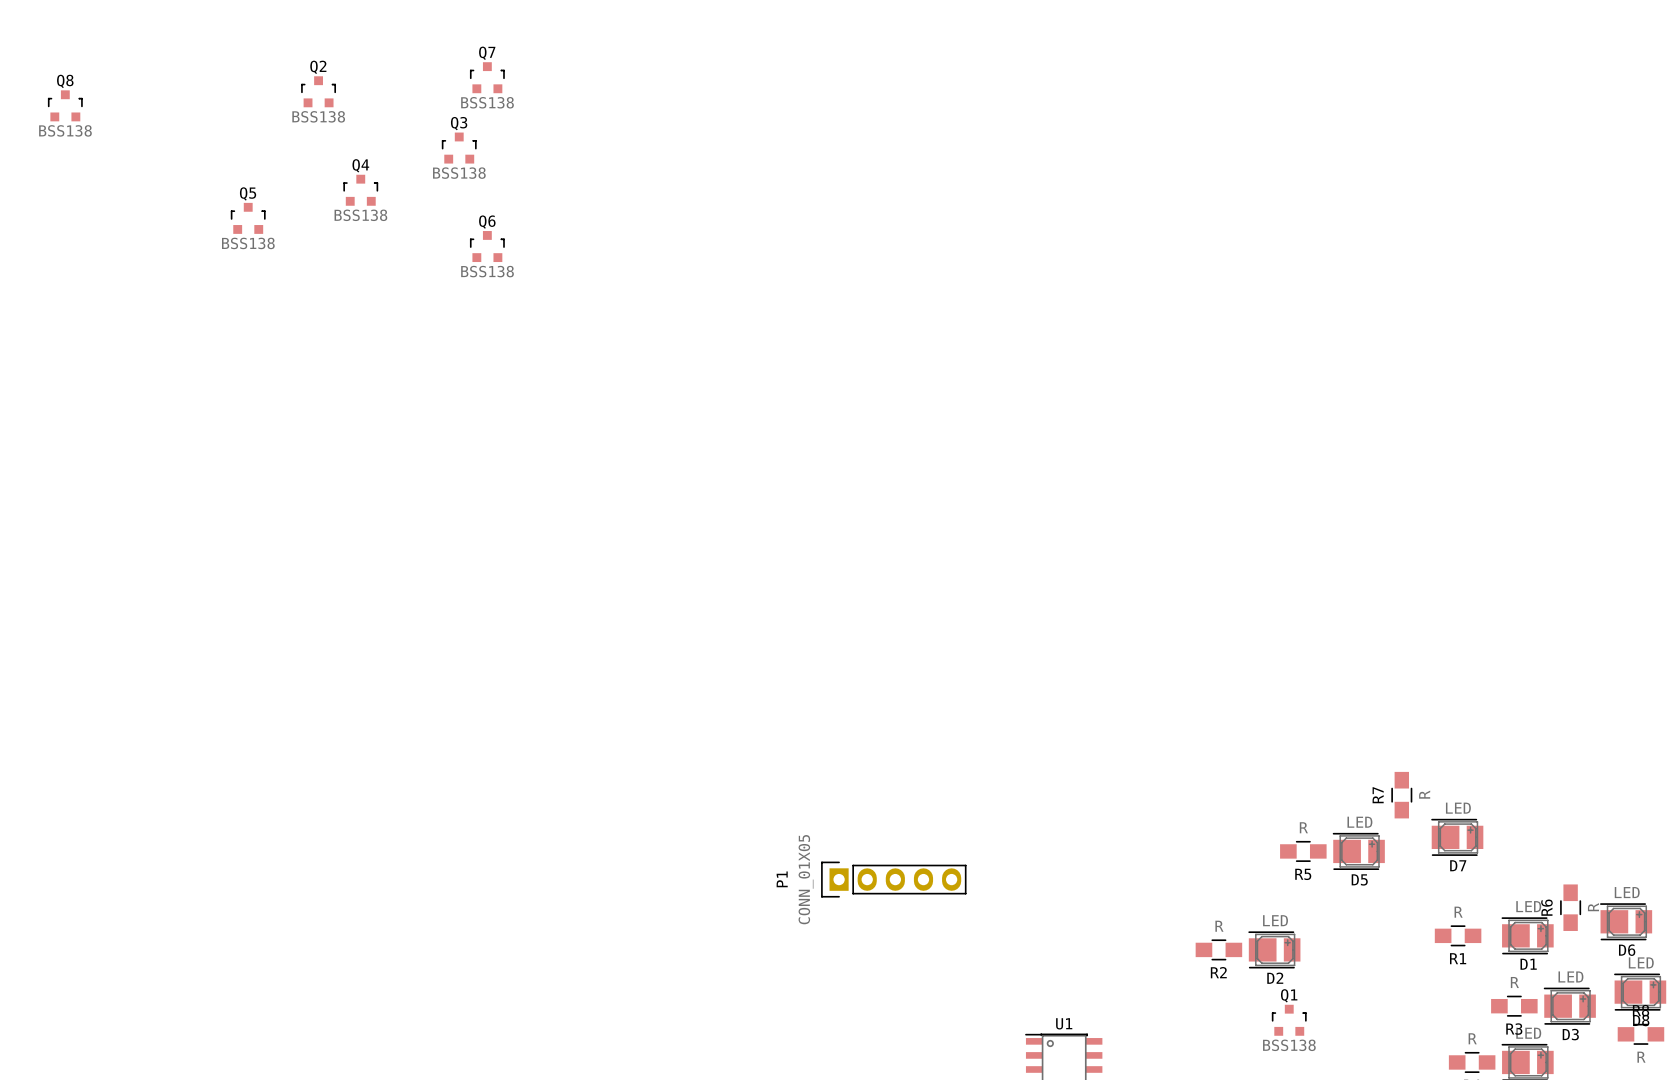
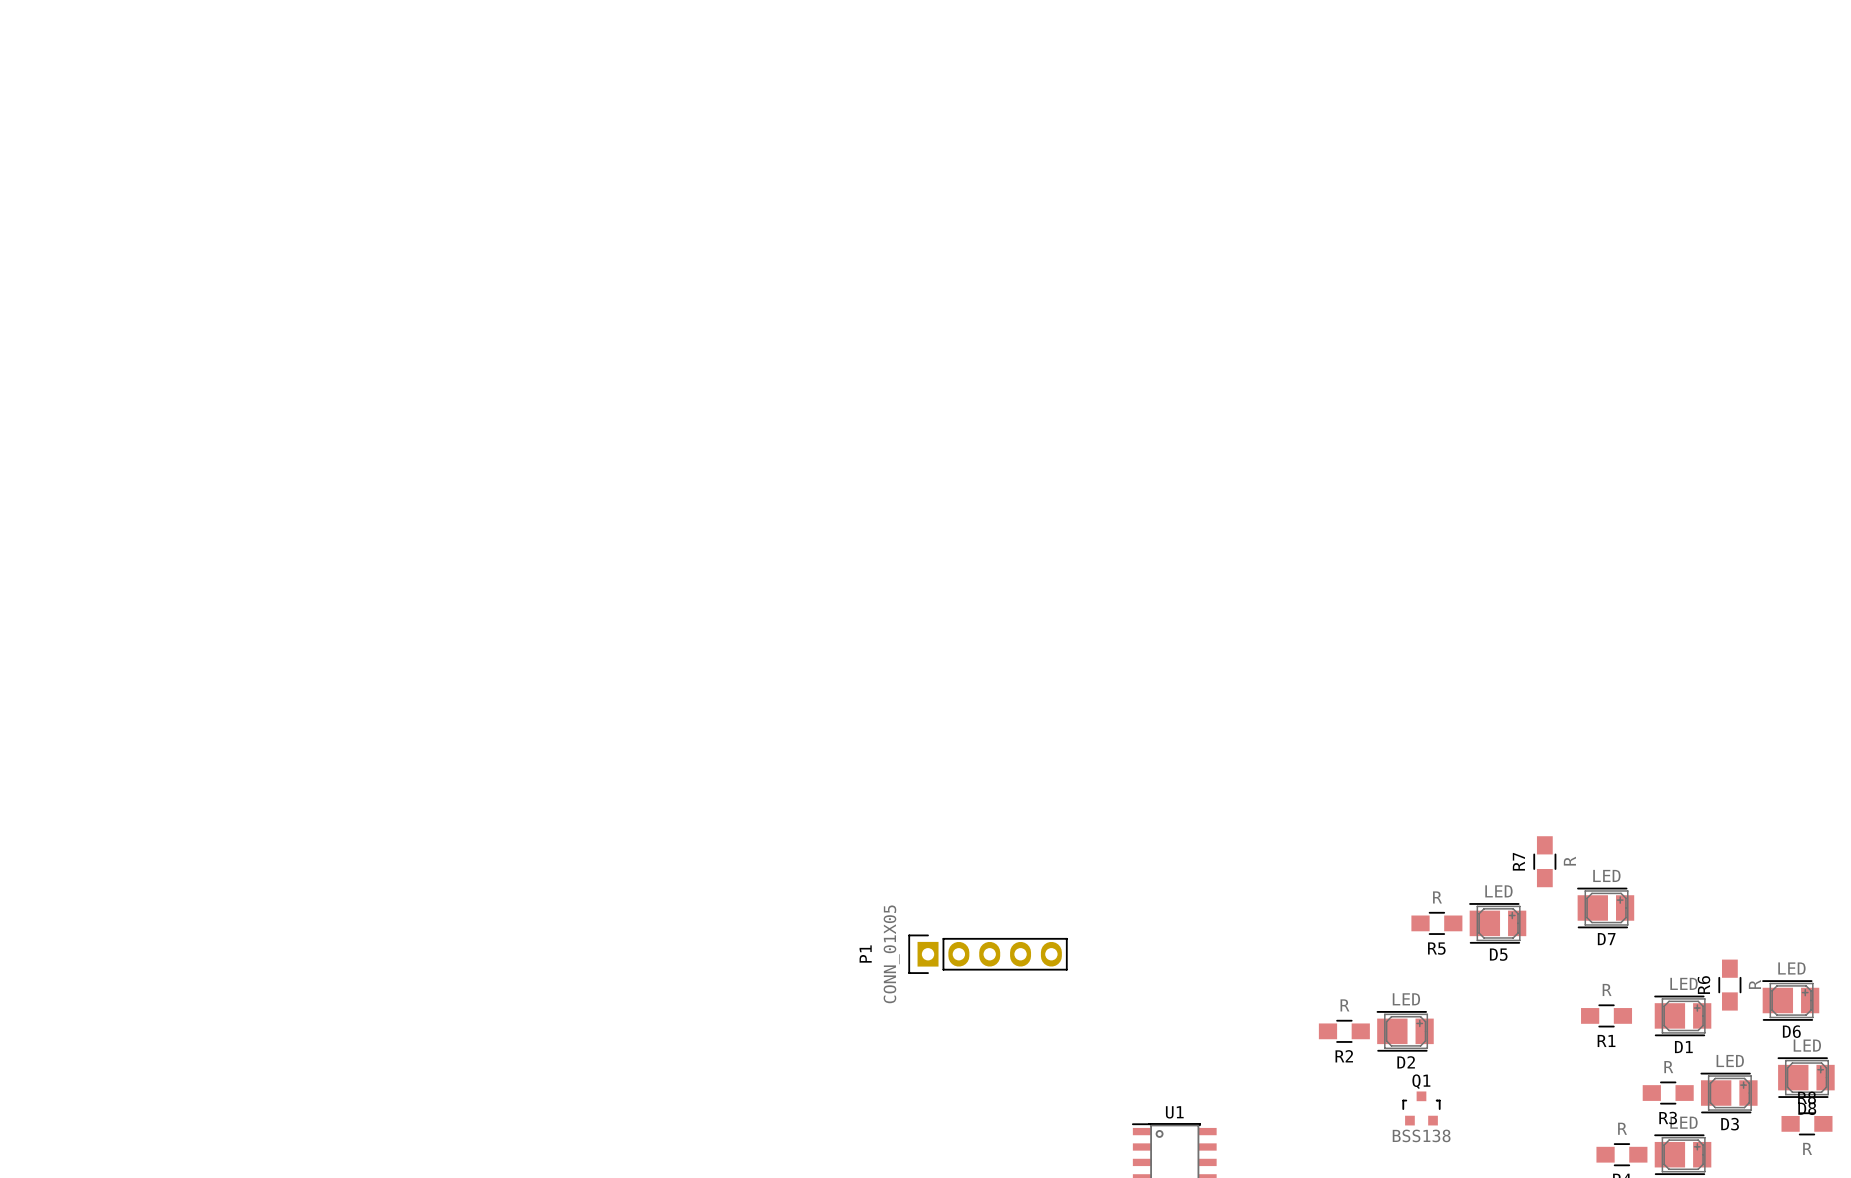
Q7: BSS138 (487, 77) -> none
Q2: BSS138 (318, 91) -> none
Q8: BSS138 (65, 105) -> none
Q3: BSS138 (459, 148) -> none
Q4: BSS138 (360, 190) -> none
Q5: BSS138 (248, 218) -> none
Q6: BSS138 (487, 246) -> none

